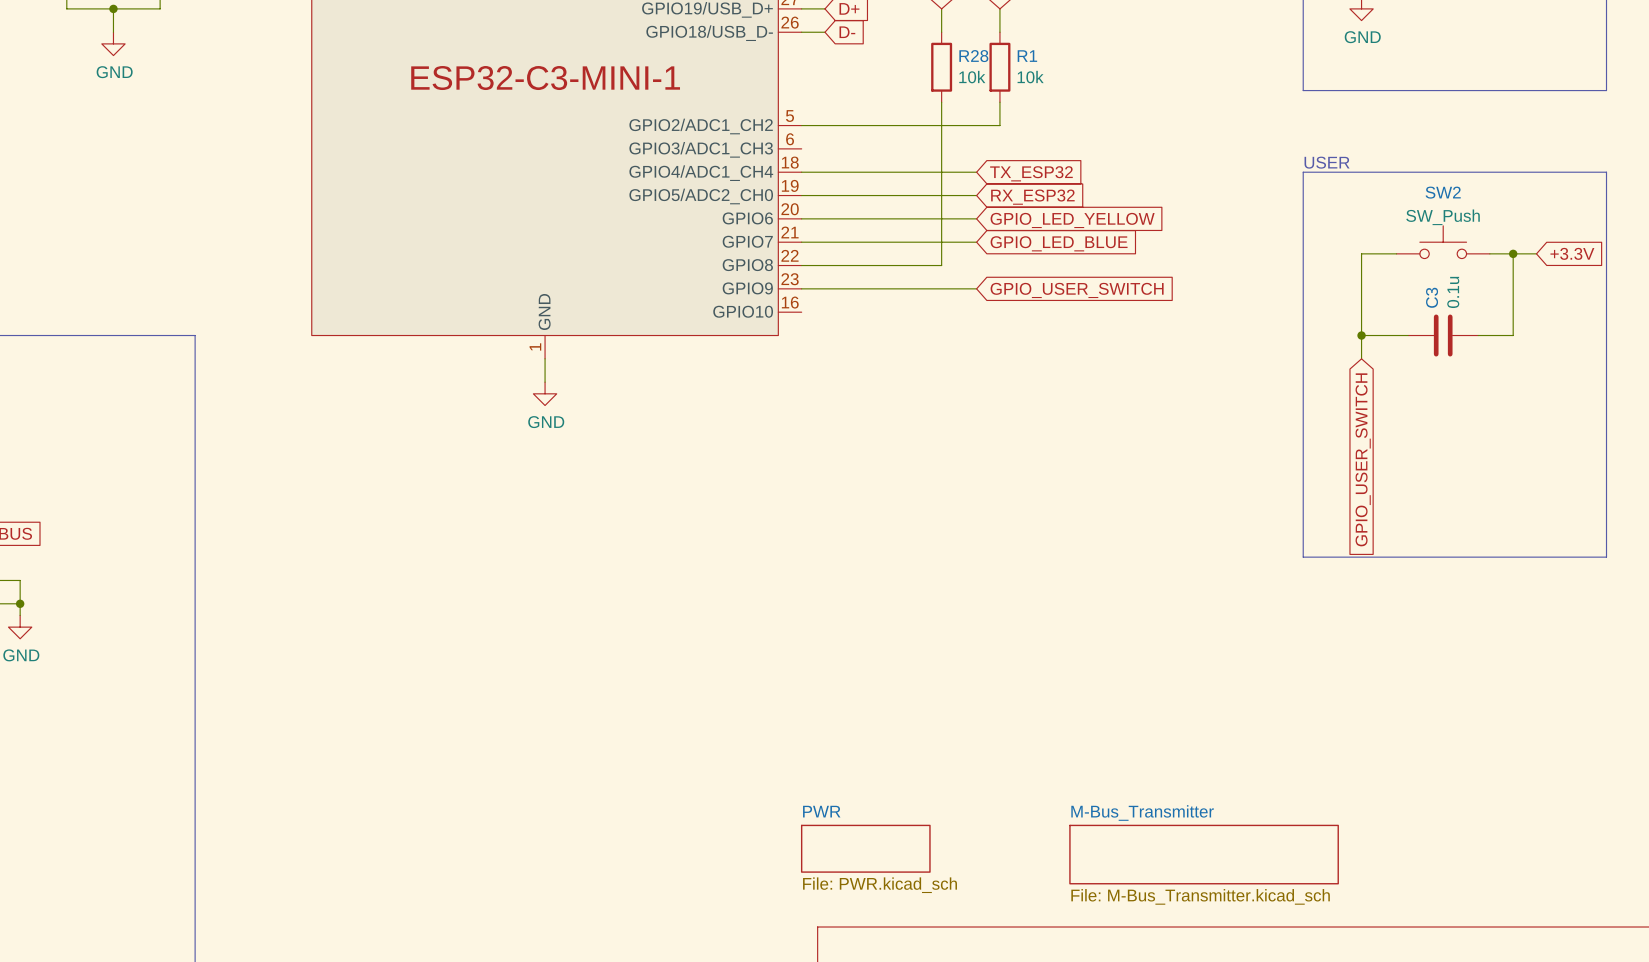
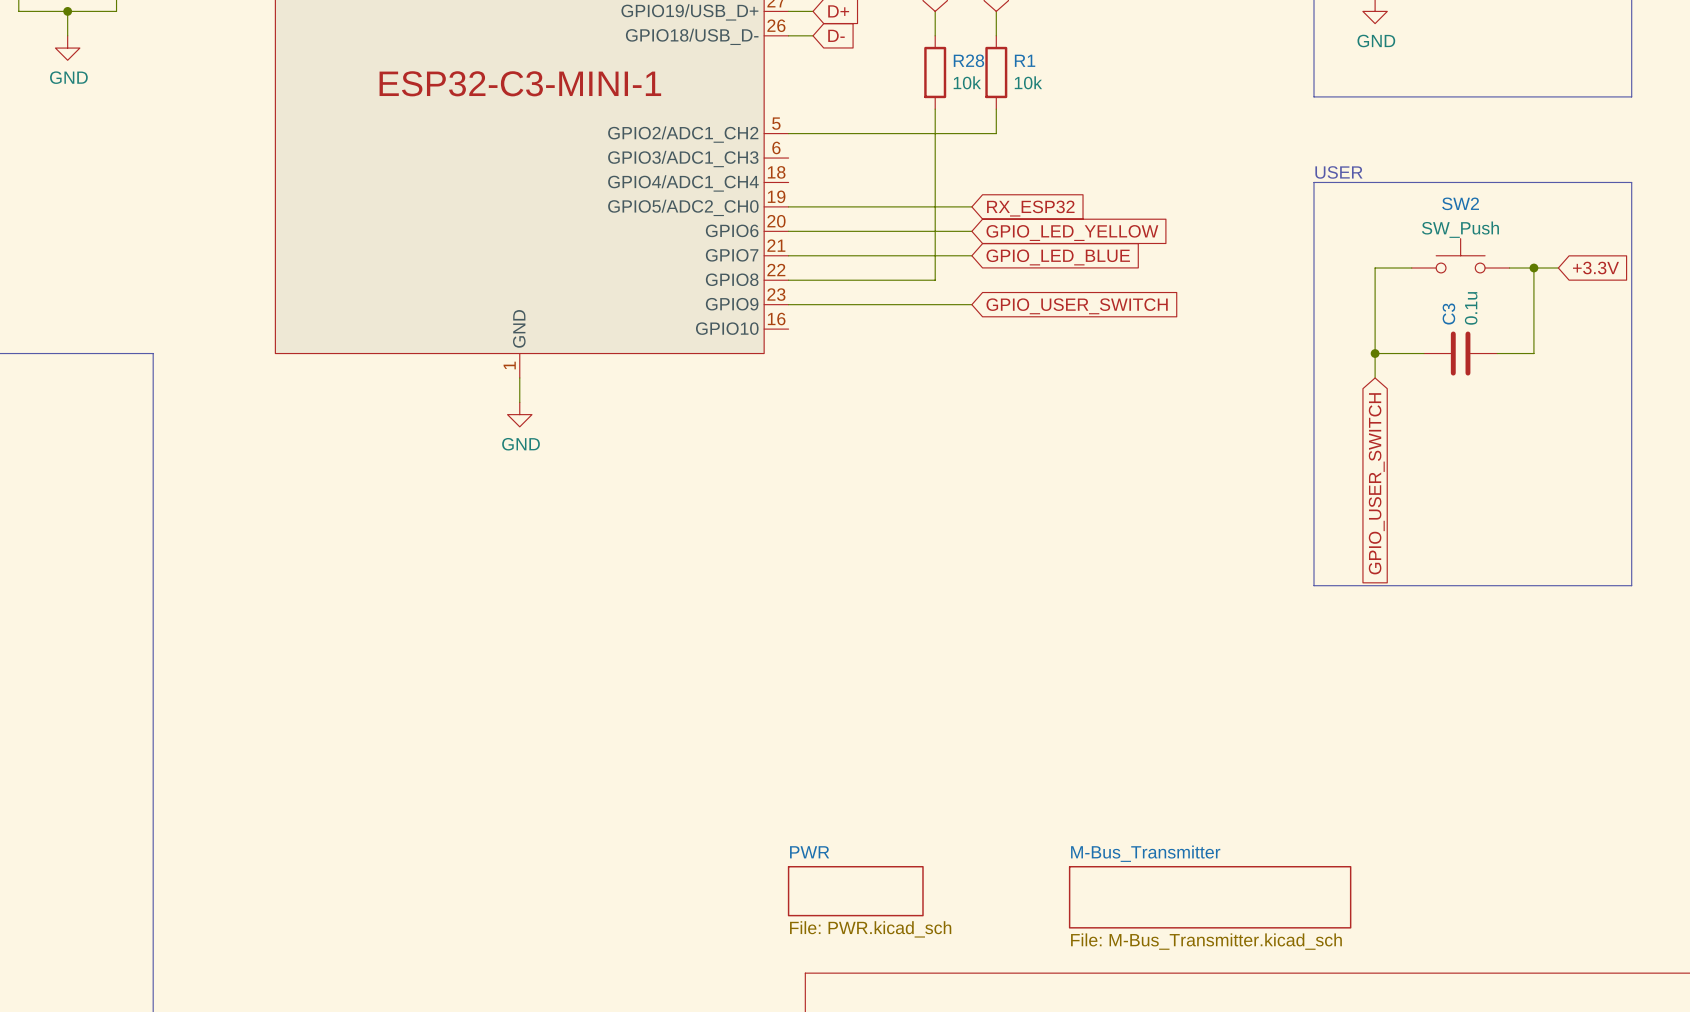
wire: (801, 172) (976, 172) -> none
global label: TX_ESP32 (1031, 173) -> none

